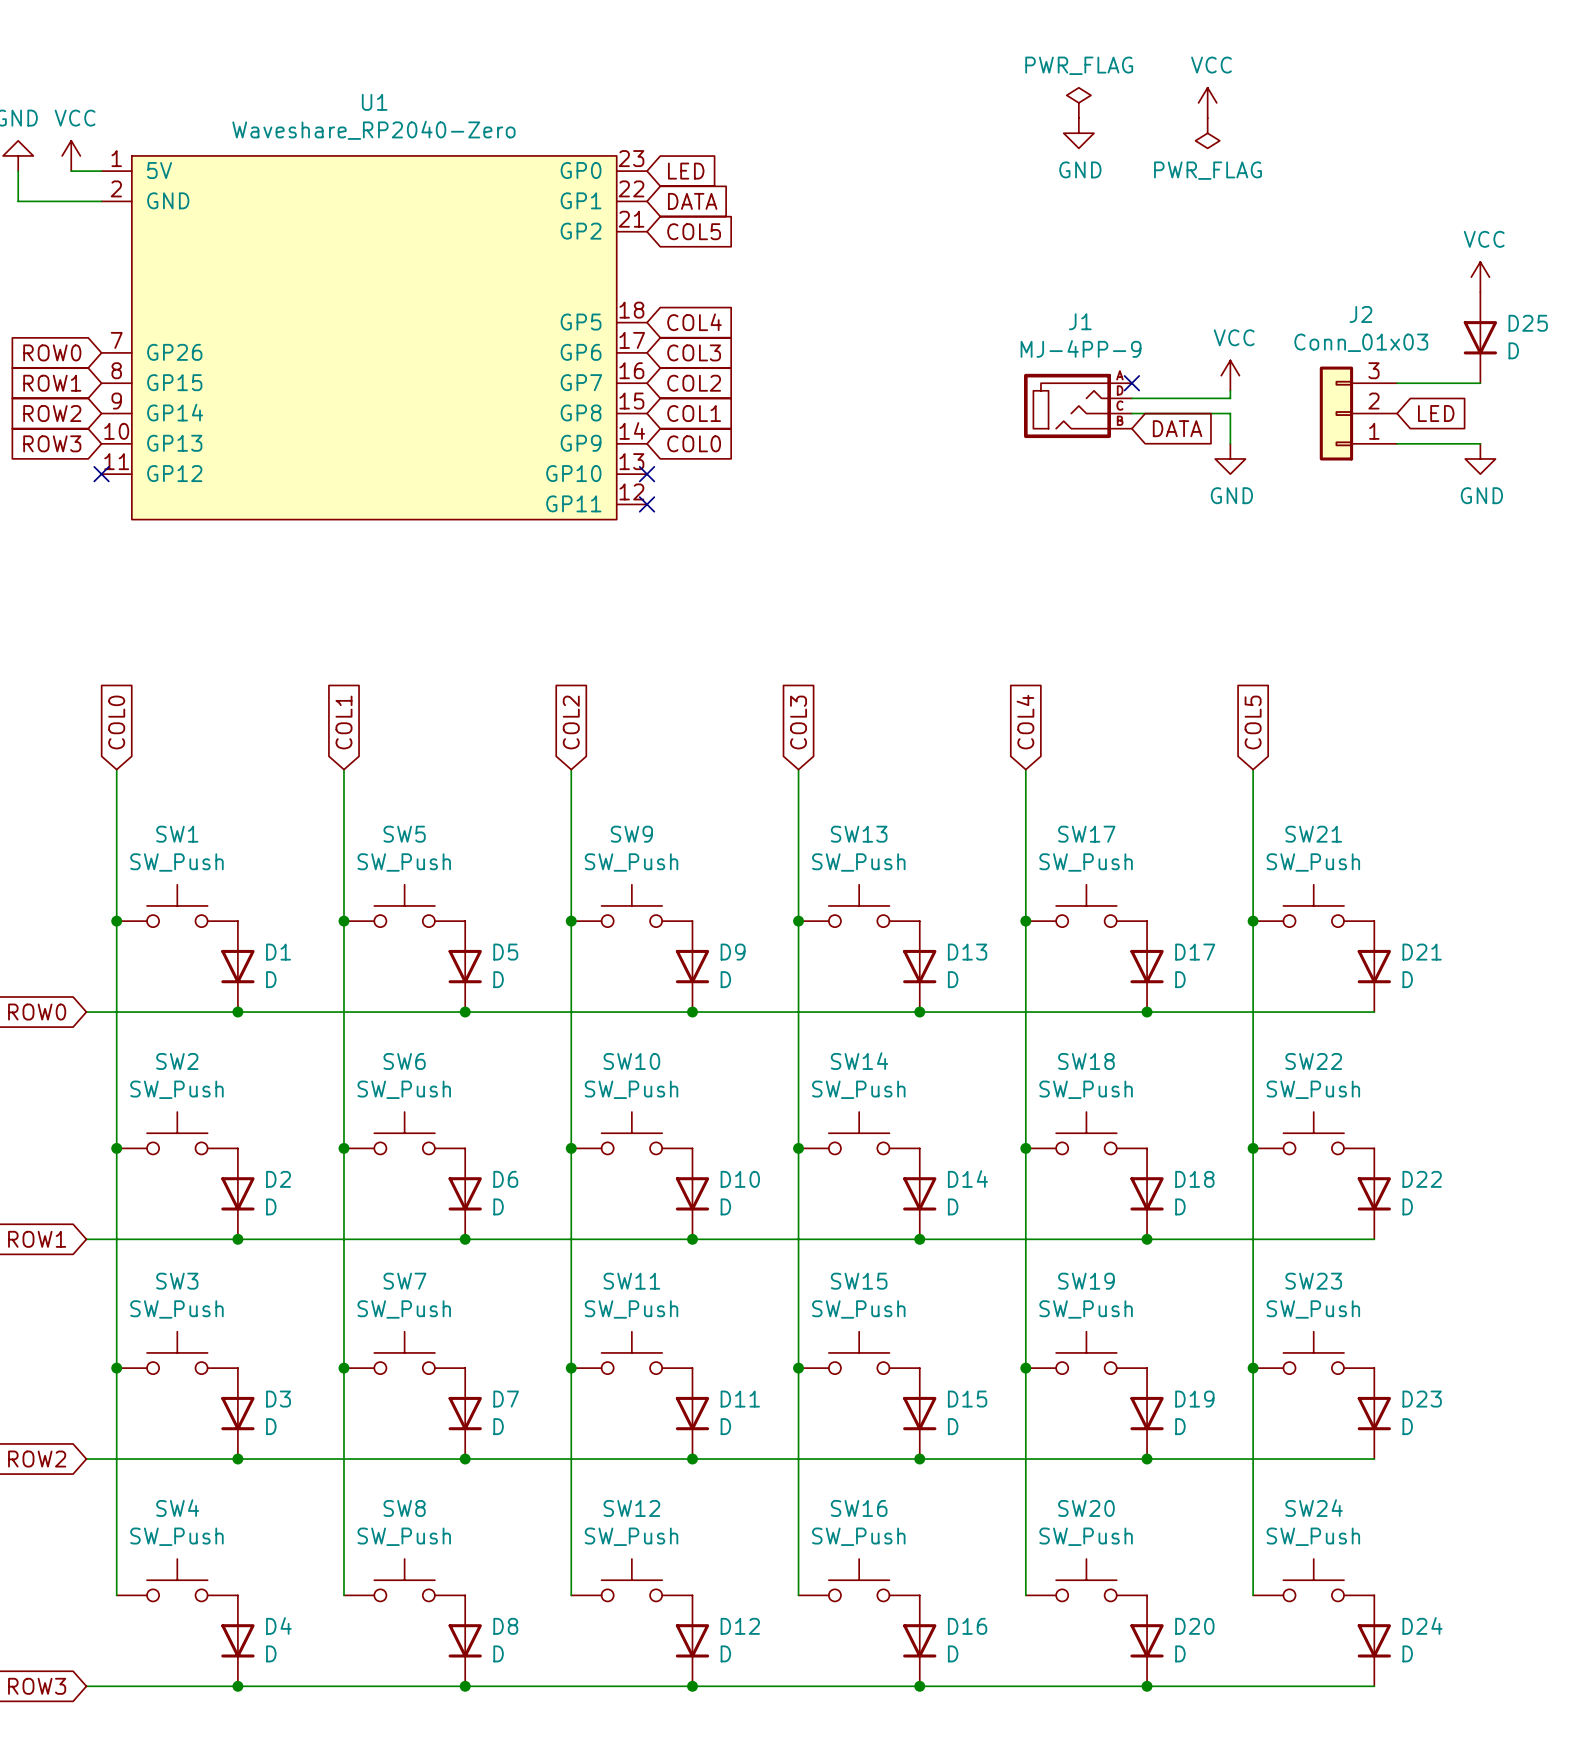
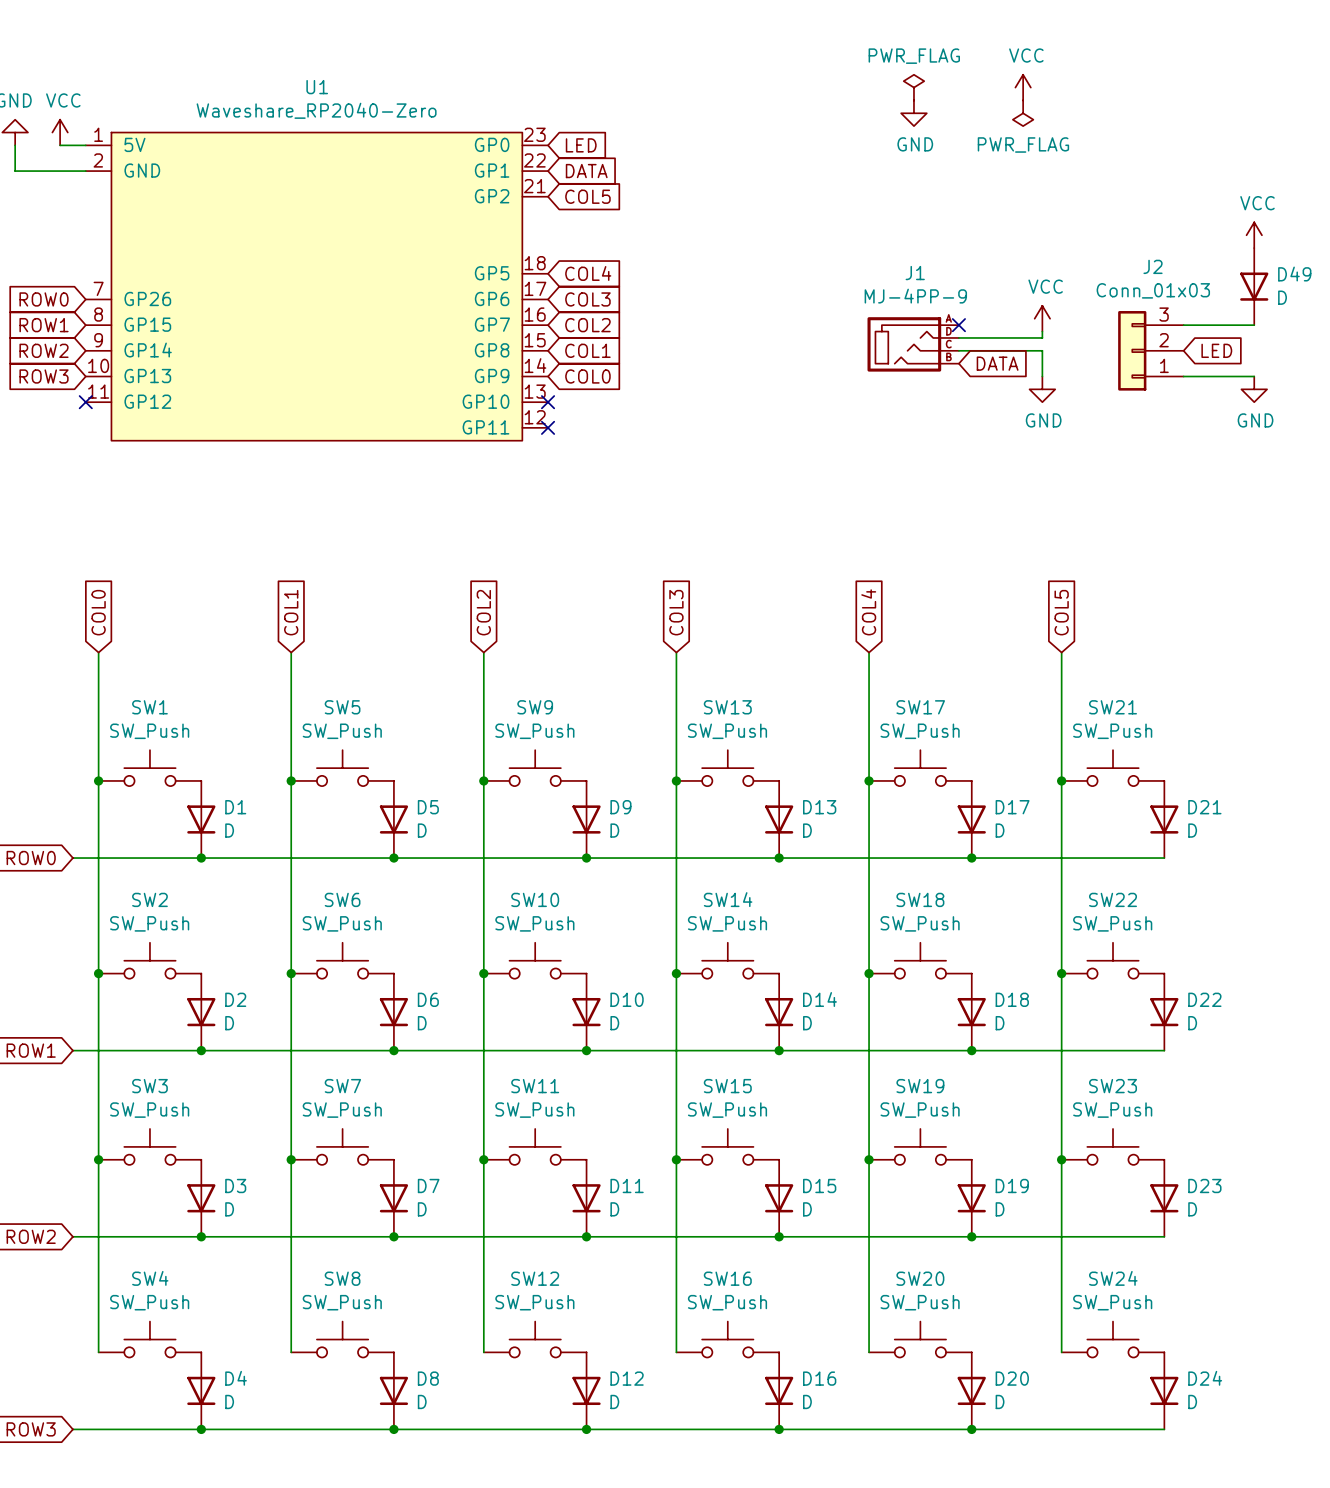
D25 name: D25 (1528, 323) -> D49 (1294, 274)

